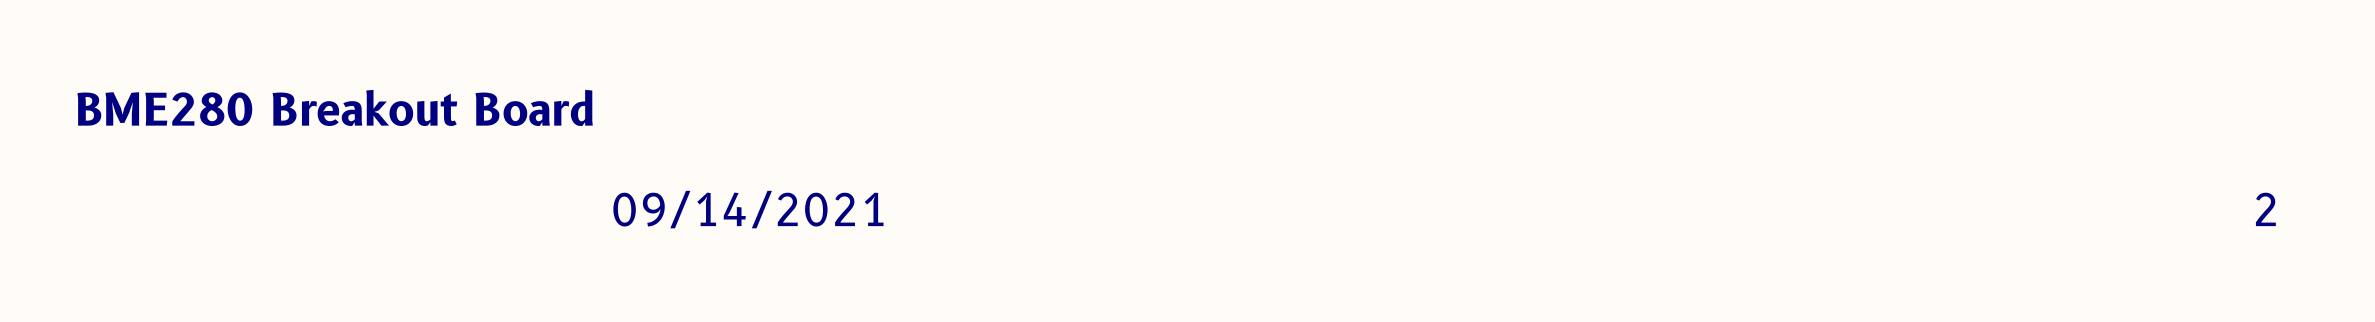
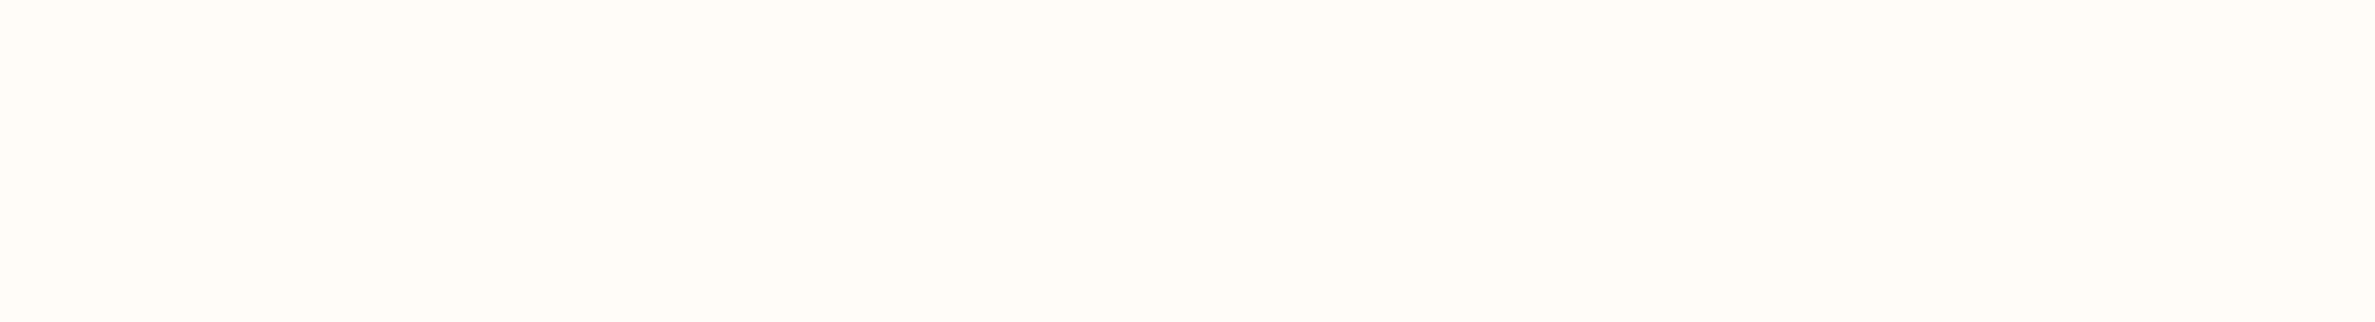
text: BME280 Breakout Board (335, 107) -> none
text: 09/14/2021 (748, 209) -> none
text: 2 (2265, 209) -> none

